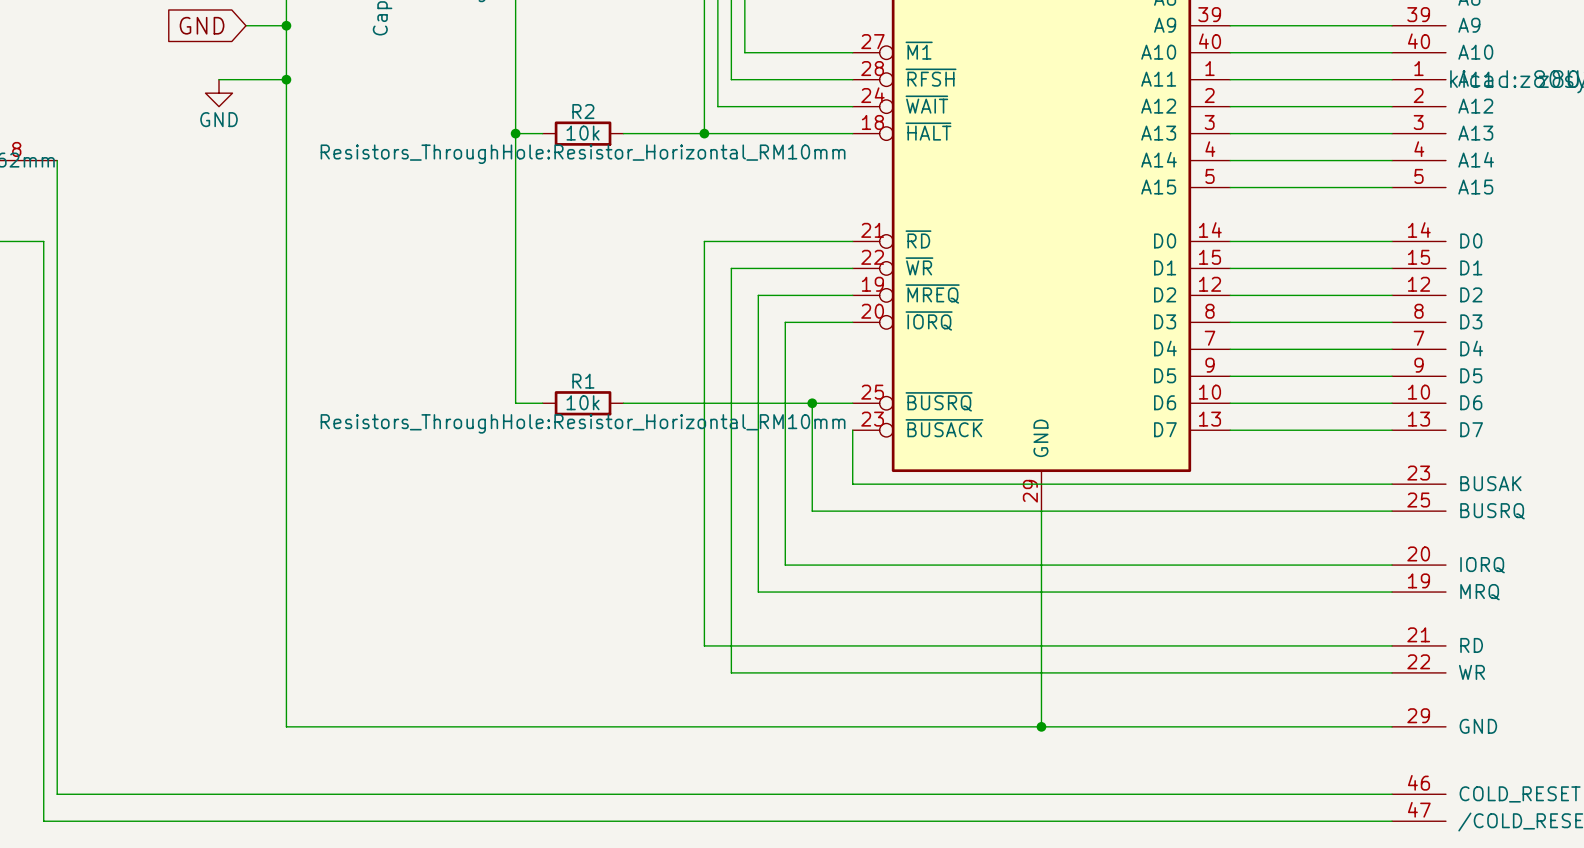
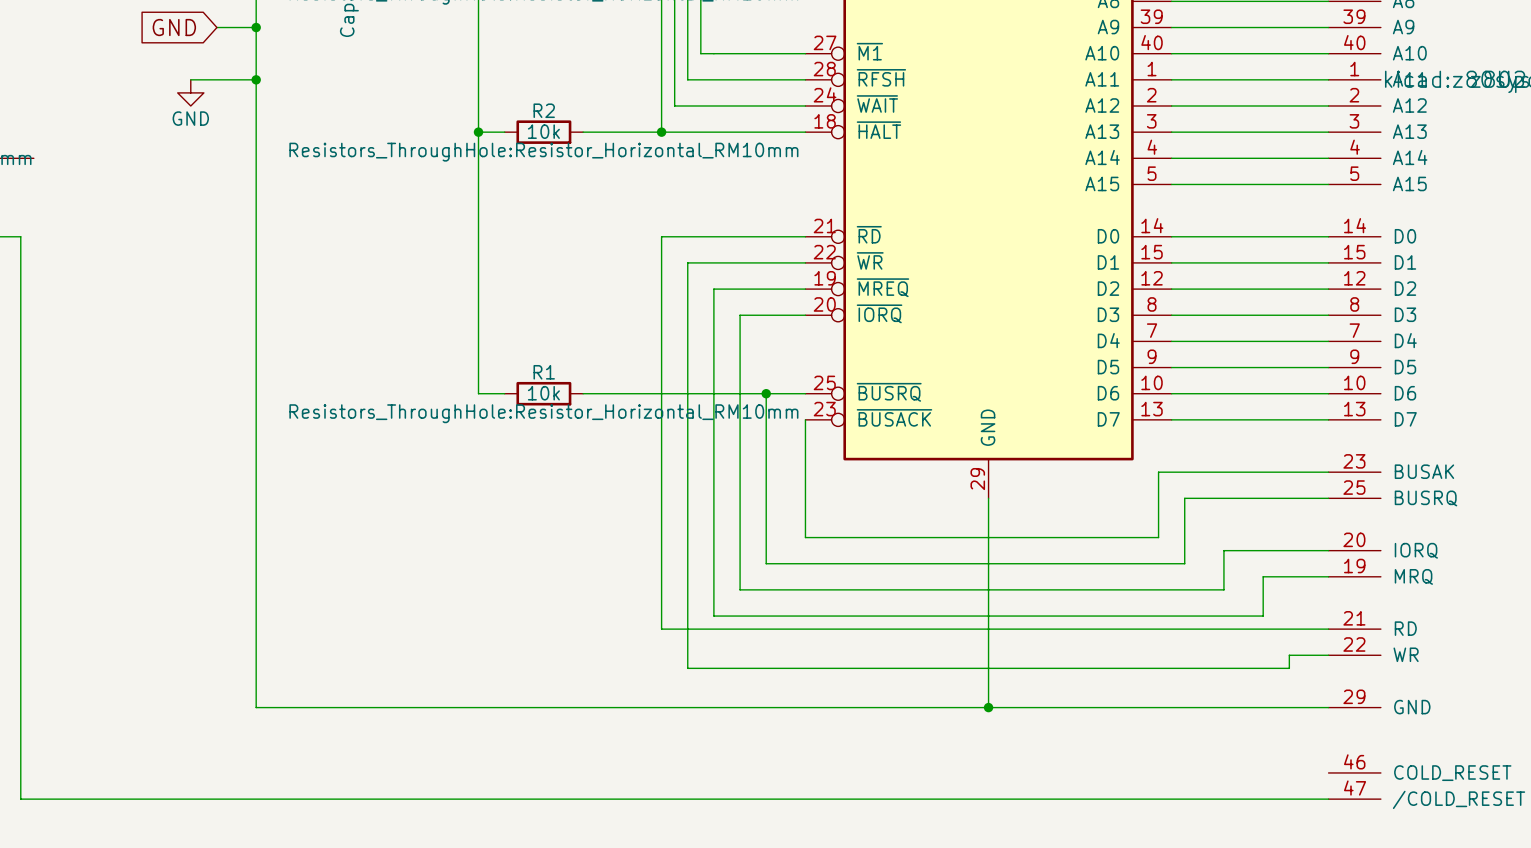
wire: (57, 160) (57, 794) (1392, 794) -> none
wire: (852, 484) (1216, 484) -> (805, 472) (805, 537) (1158, 537) (1158, 472)
wire: (812, 511) (1243, 511) -> (766, 498) (766, 563) (1184, 563) (1184, 498)
wire: (785, 565) (1284, 565) -> (740, 550) (740, 589) (1223, 589) (1223, 550)
wire: (758, 592) (1324, 592) -> (713, 576) (713, 616) (1263, 616) (1263, 576)
wire: (731, 672) (1351, 672) -> (687, 655) (687, 668) (1289, 668) (1289, 655)

